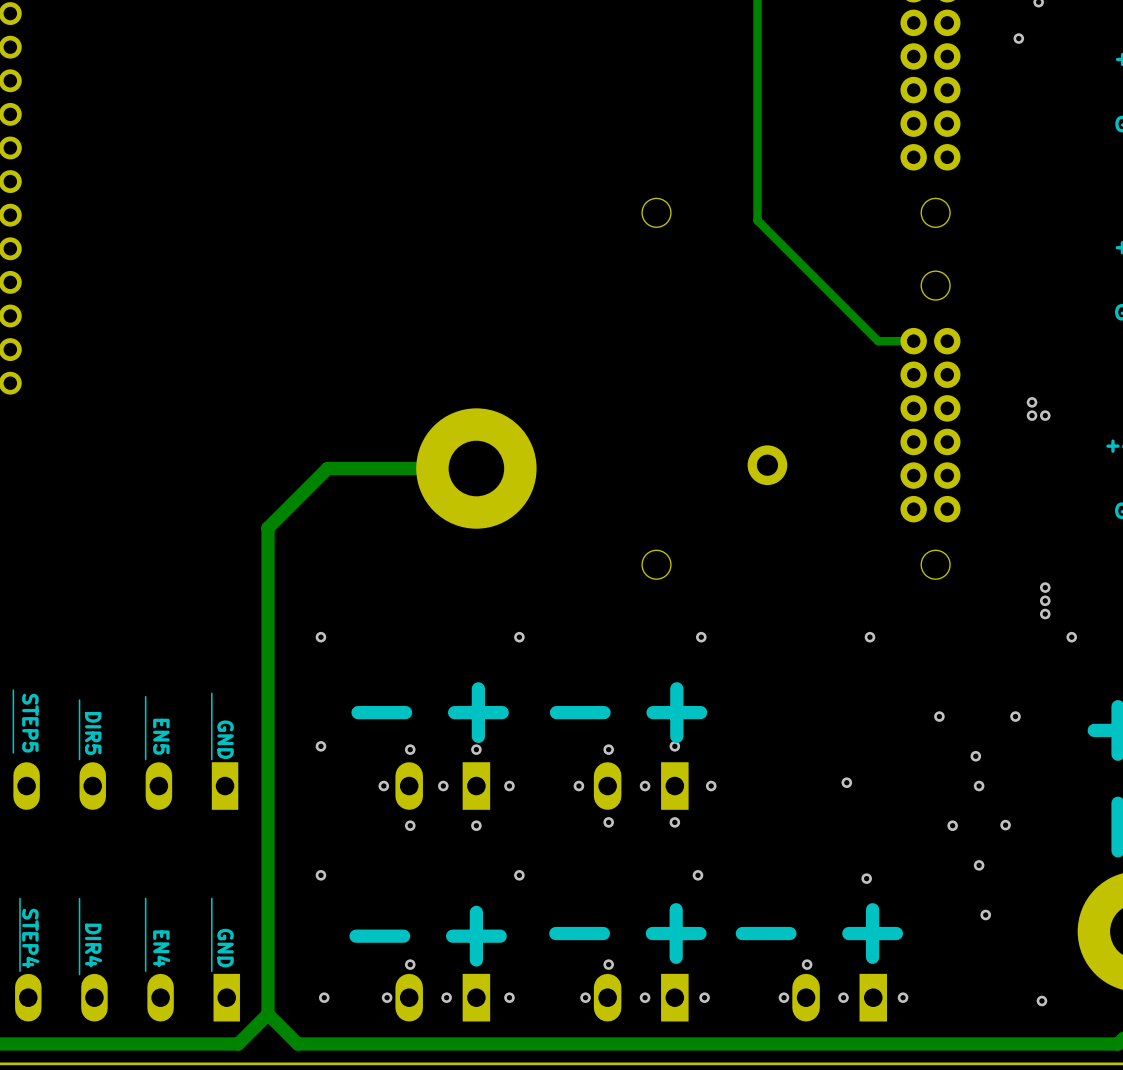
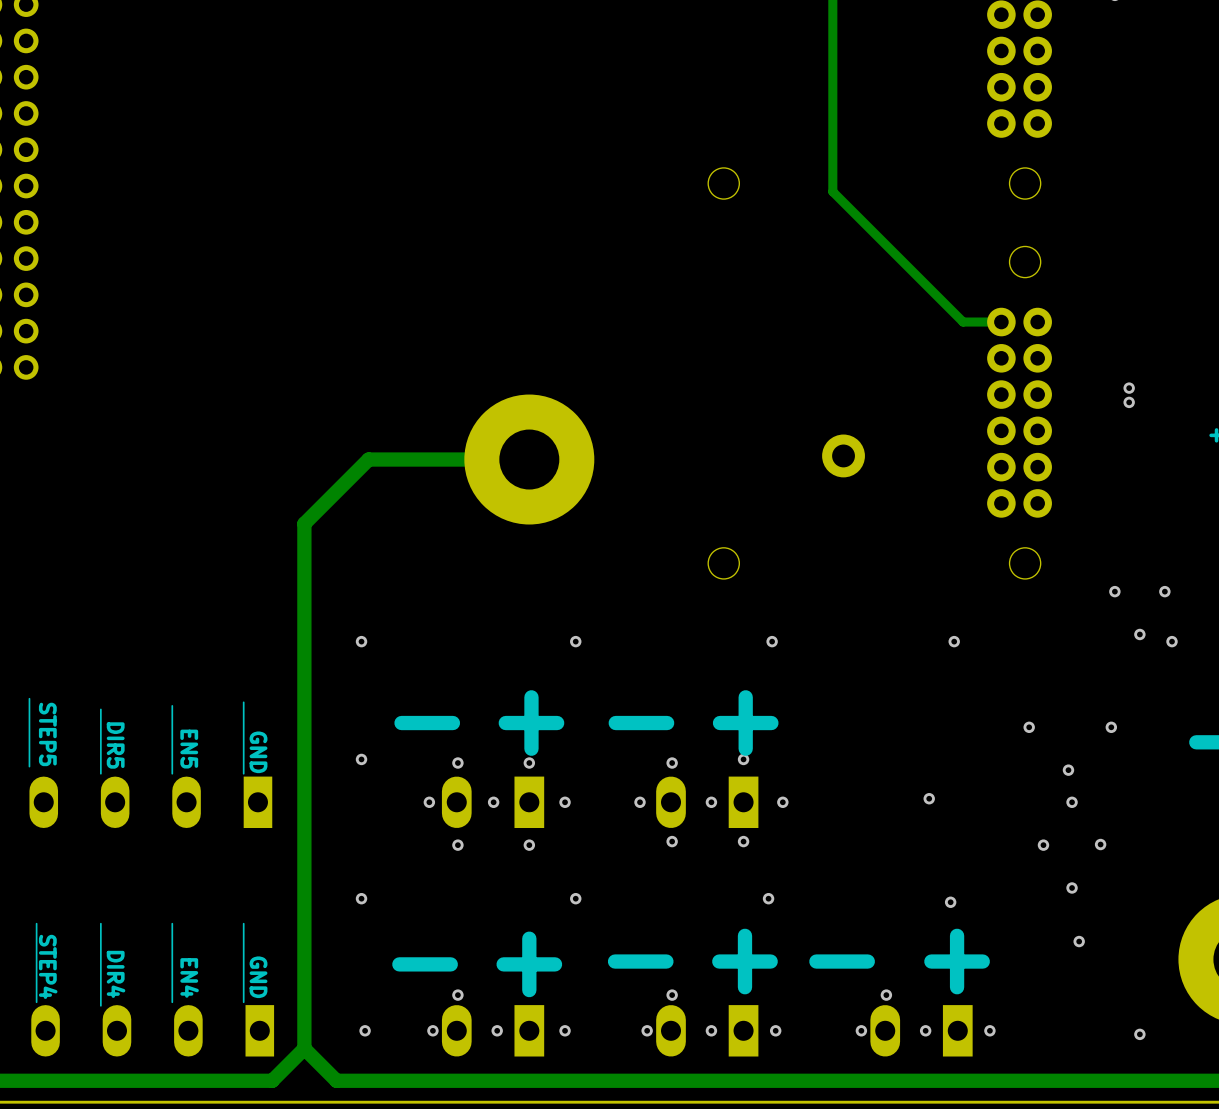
via: (1045, 415) -> none
via: (1045, 587) -> none
via: none -> (1114, 591)
via: none -> (1164, 591)
via: (1045, 600) -> none
via: (1045, 614) -> none
via: none -> (1139, 634)

